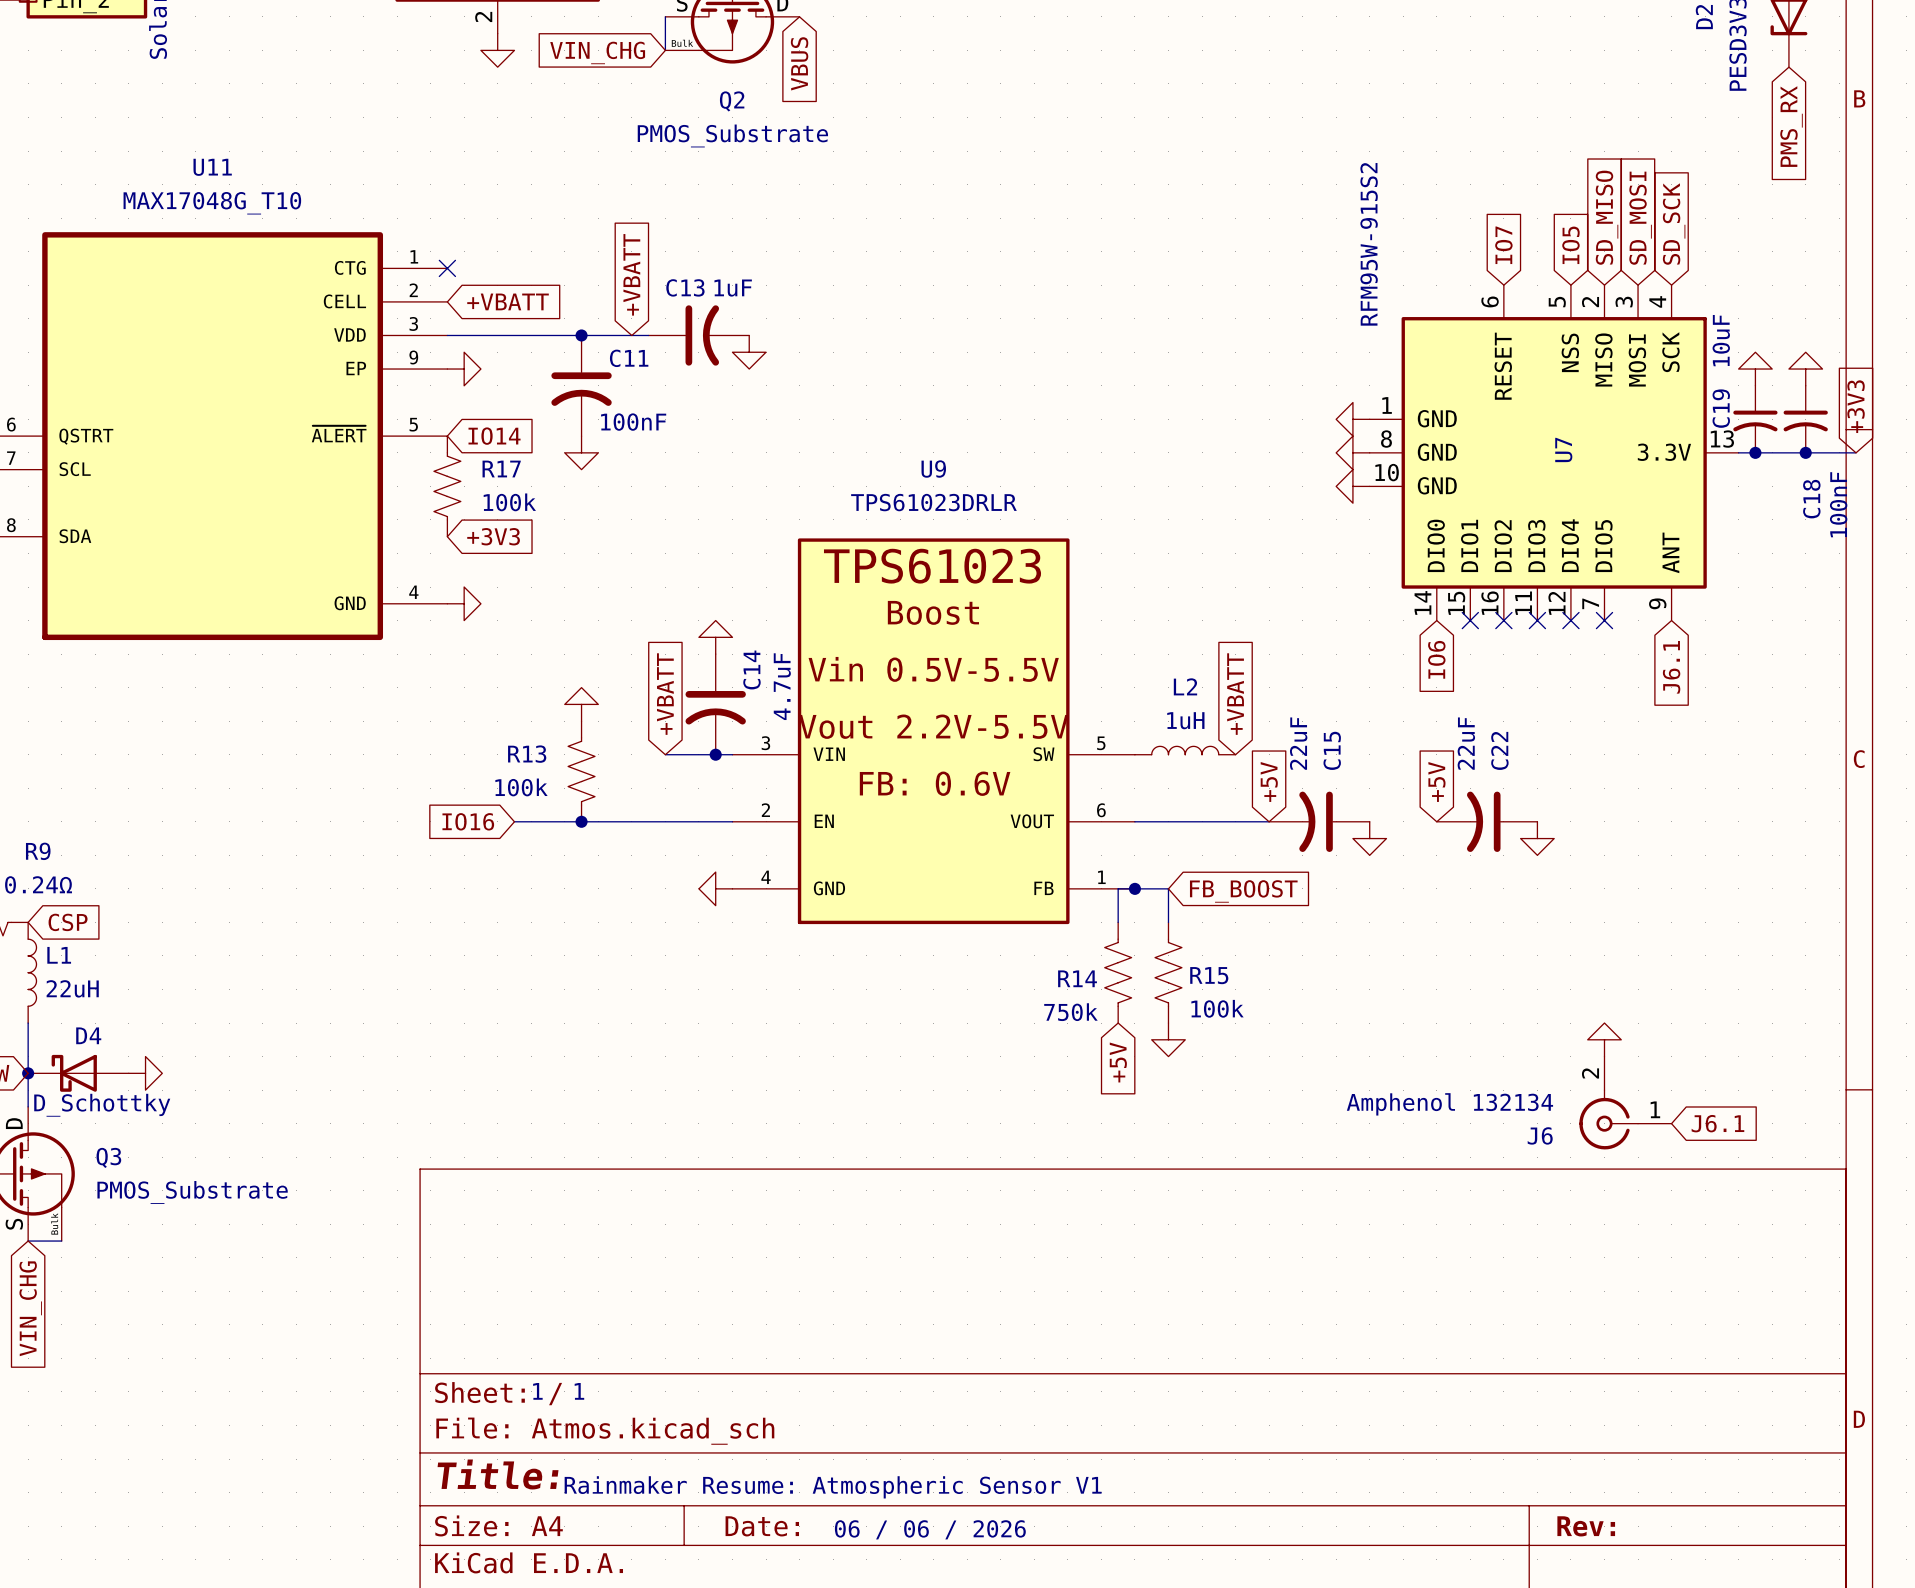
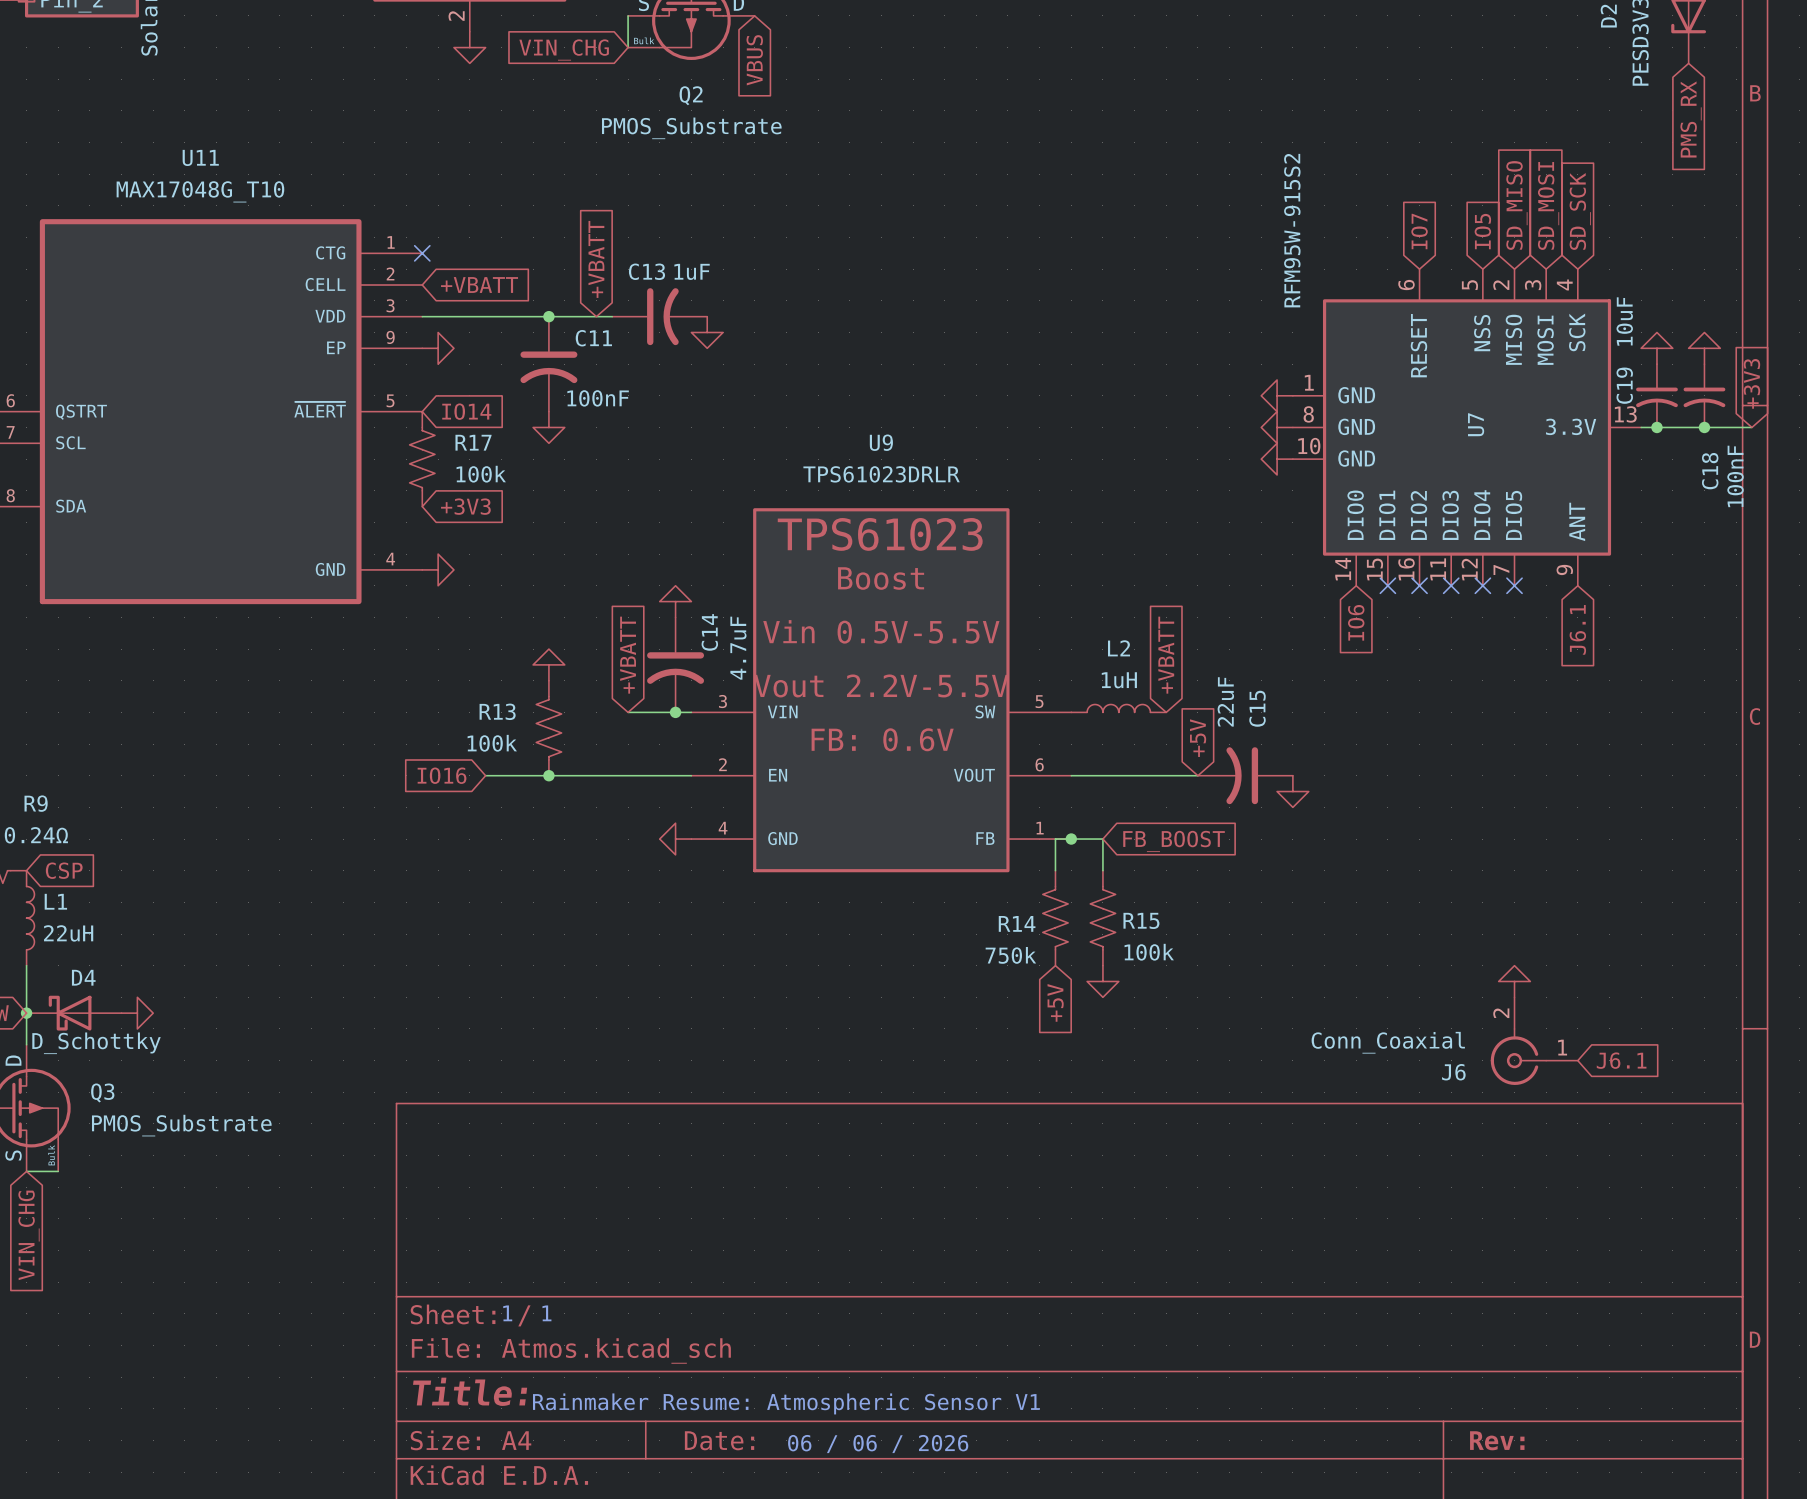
global label: +5V (1436, 781) -> none
C22: 22uF (1487, 821) -> none
power symbol: (1537, 838) -> none
J6 value: Amphenol 132134 (1449, 1104) -> Conn_Coaxial (1388, 1042)

